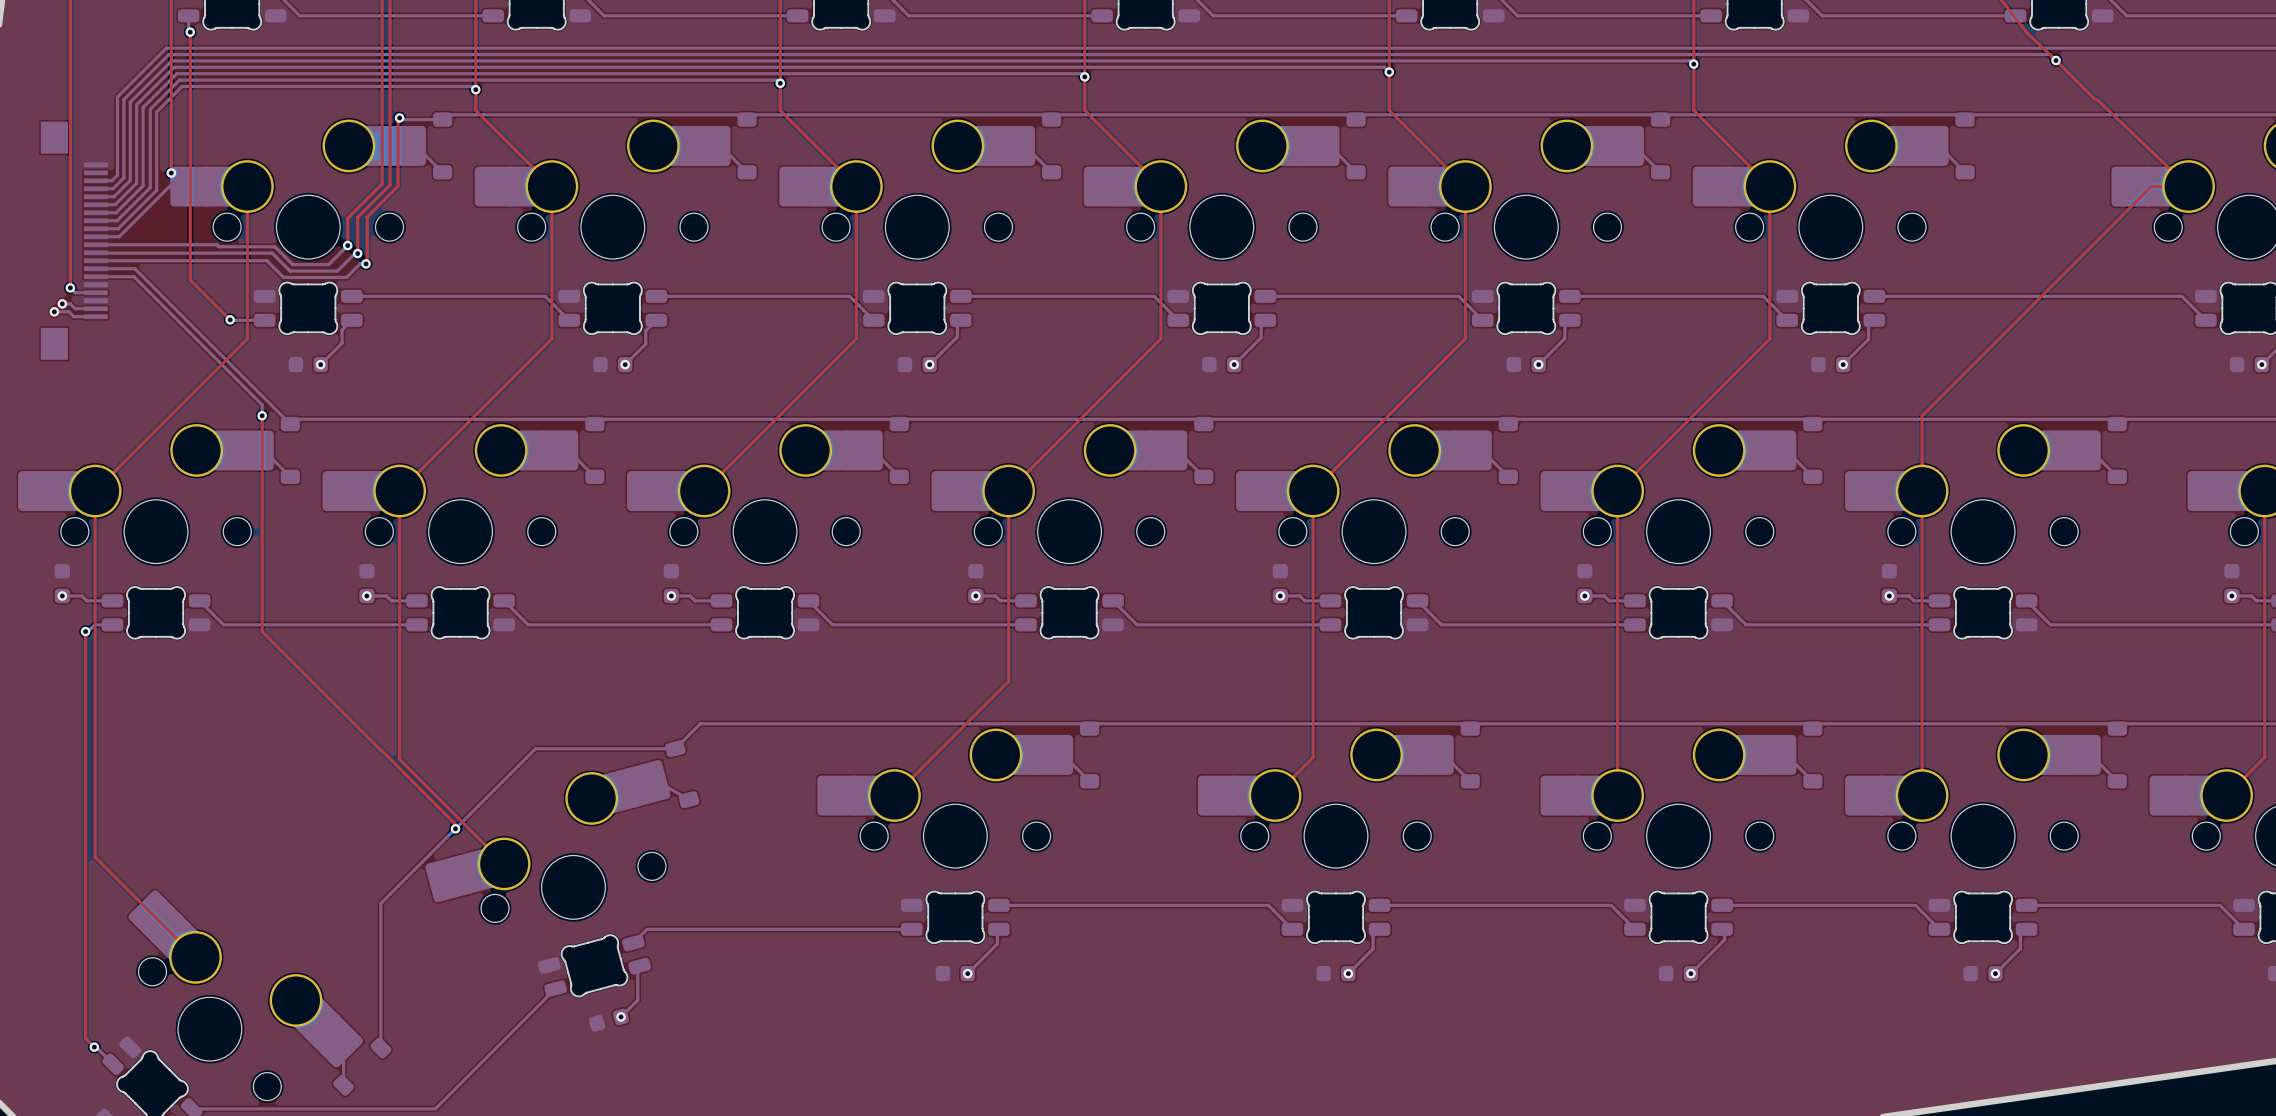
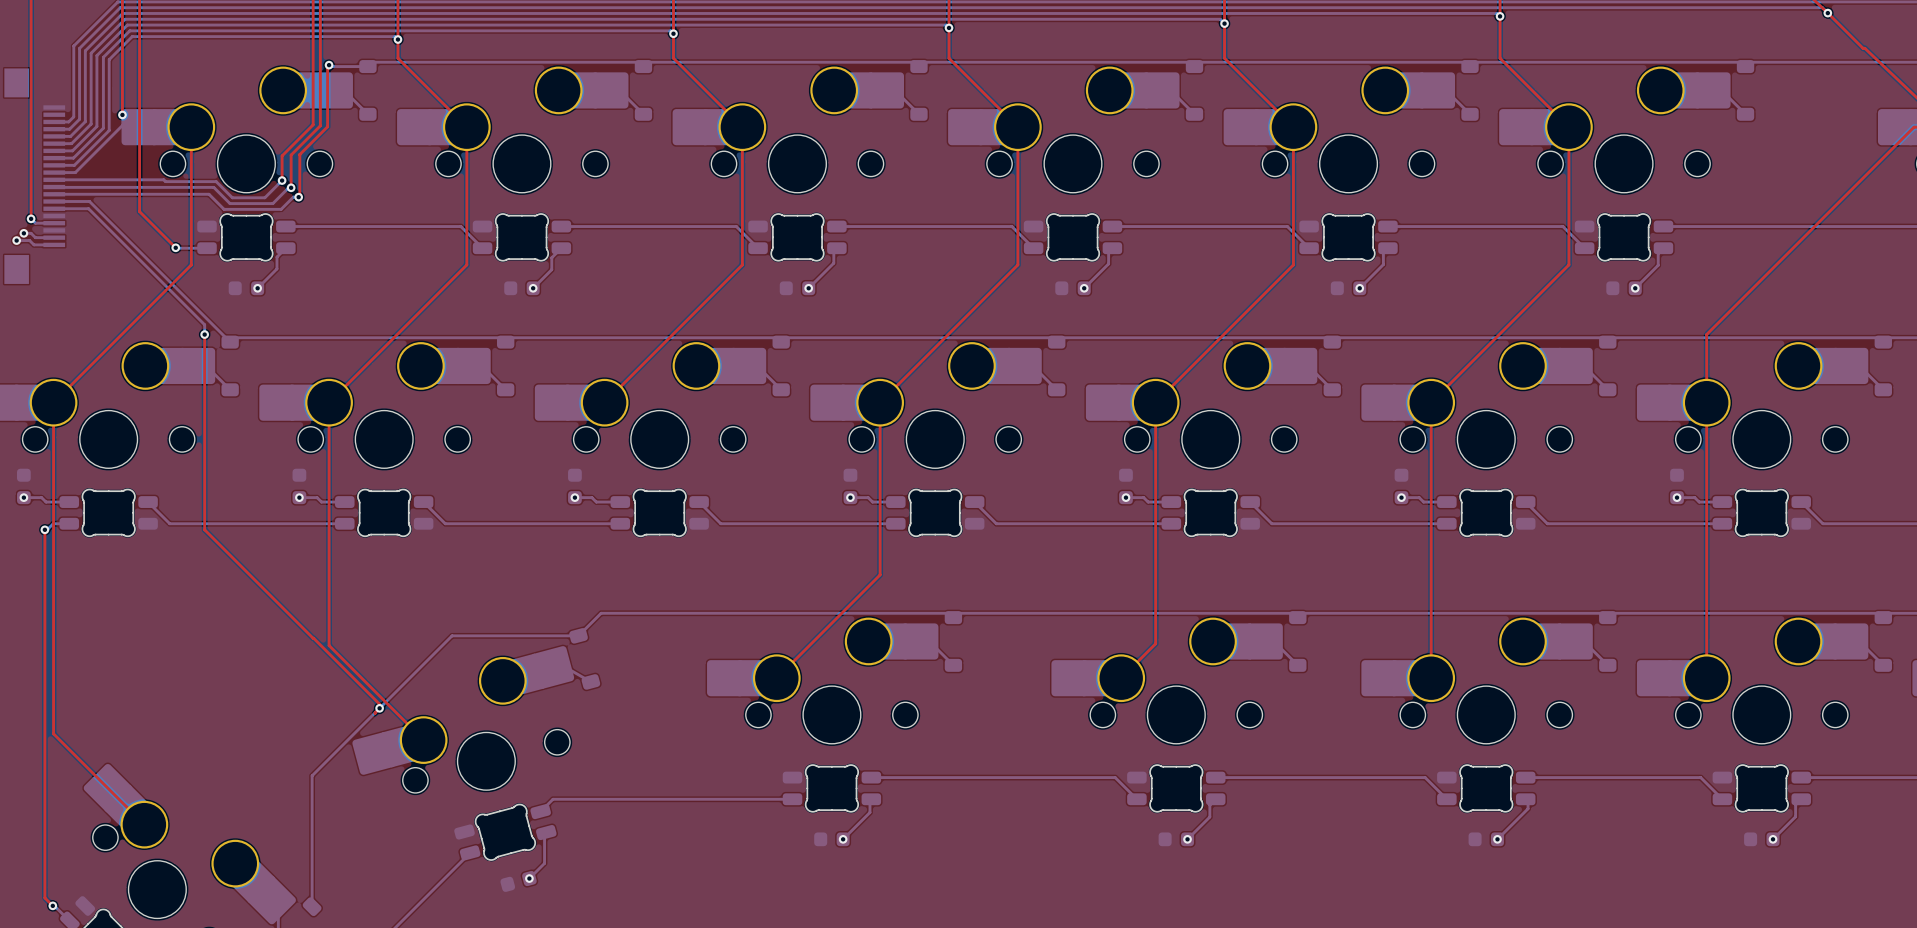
top track: none -> (379, 708) (375, 713)

